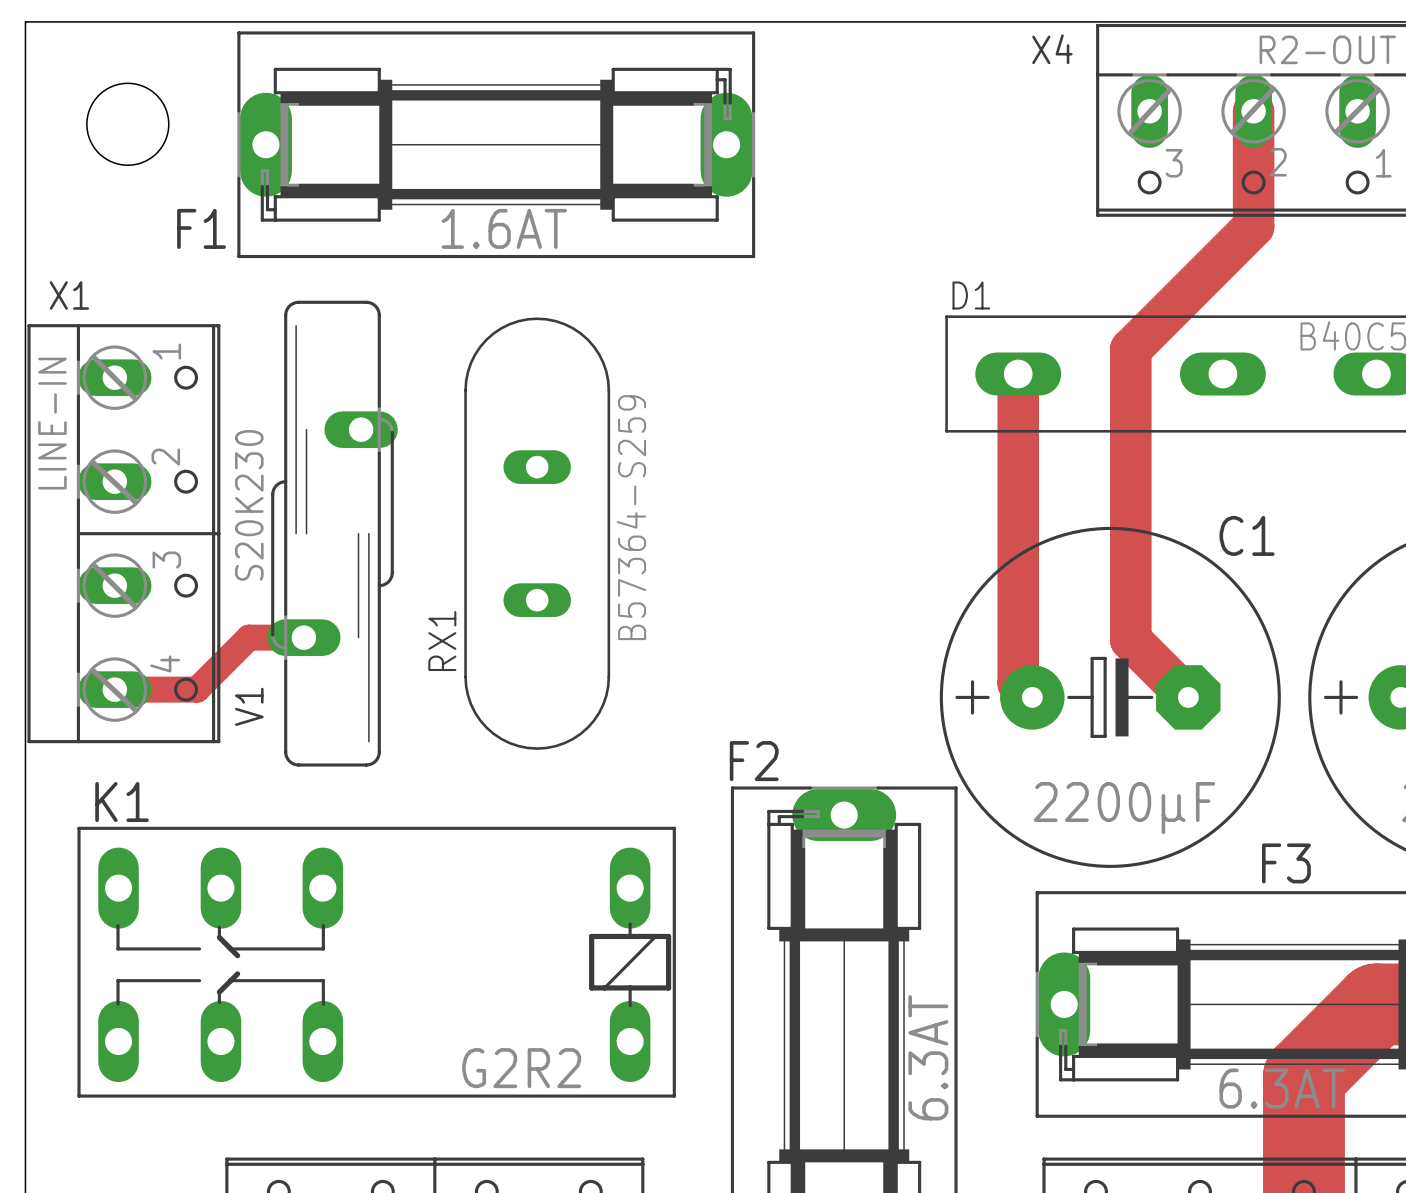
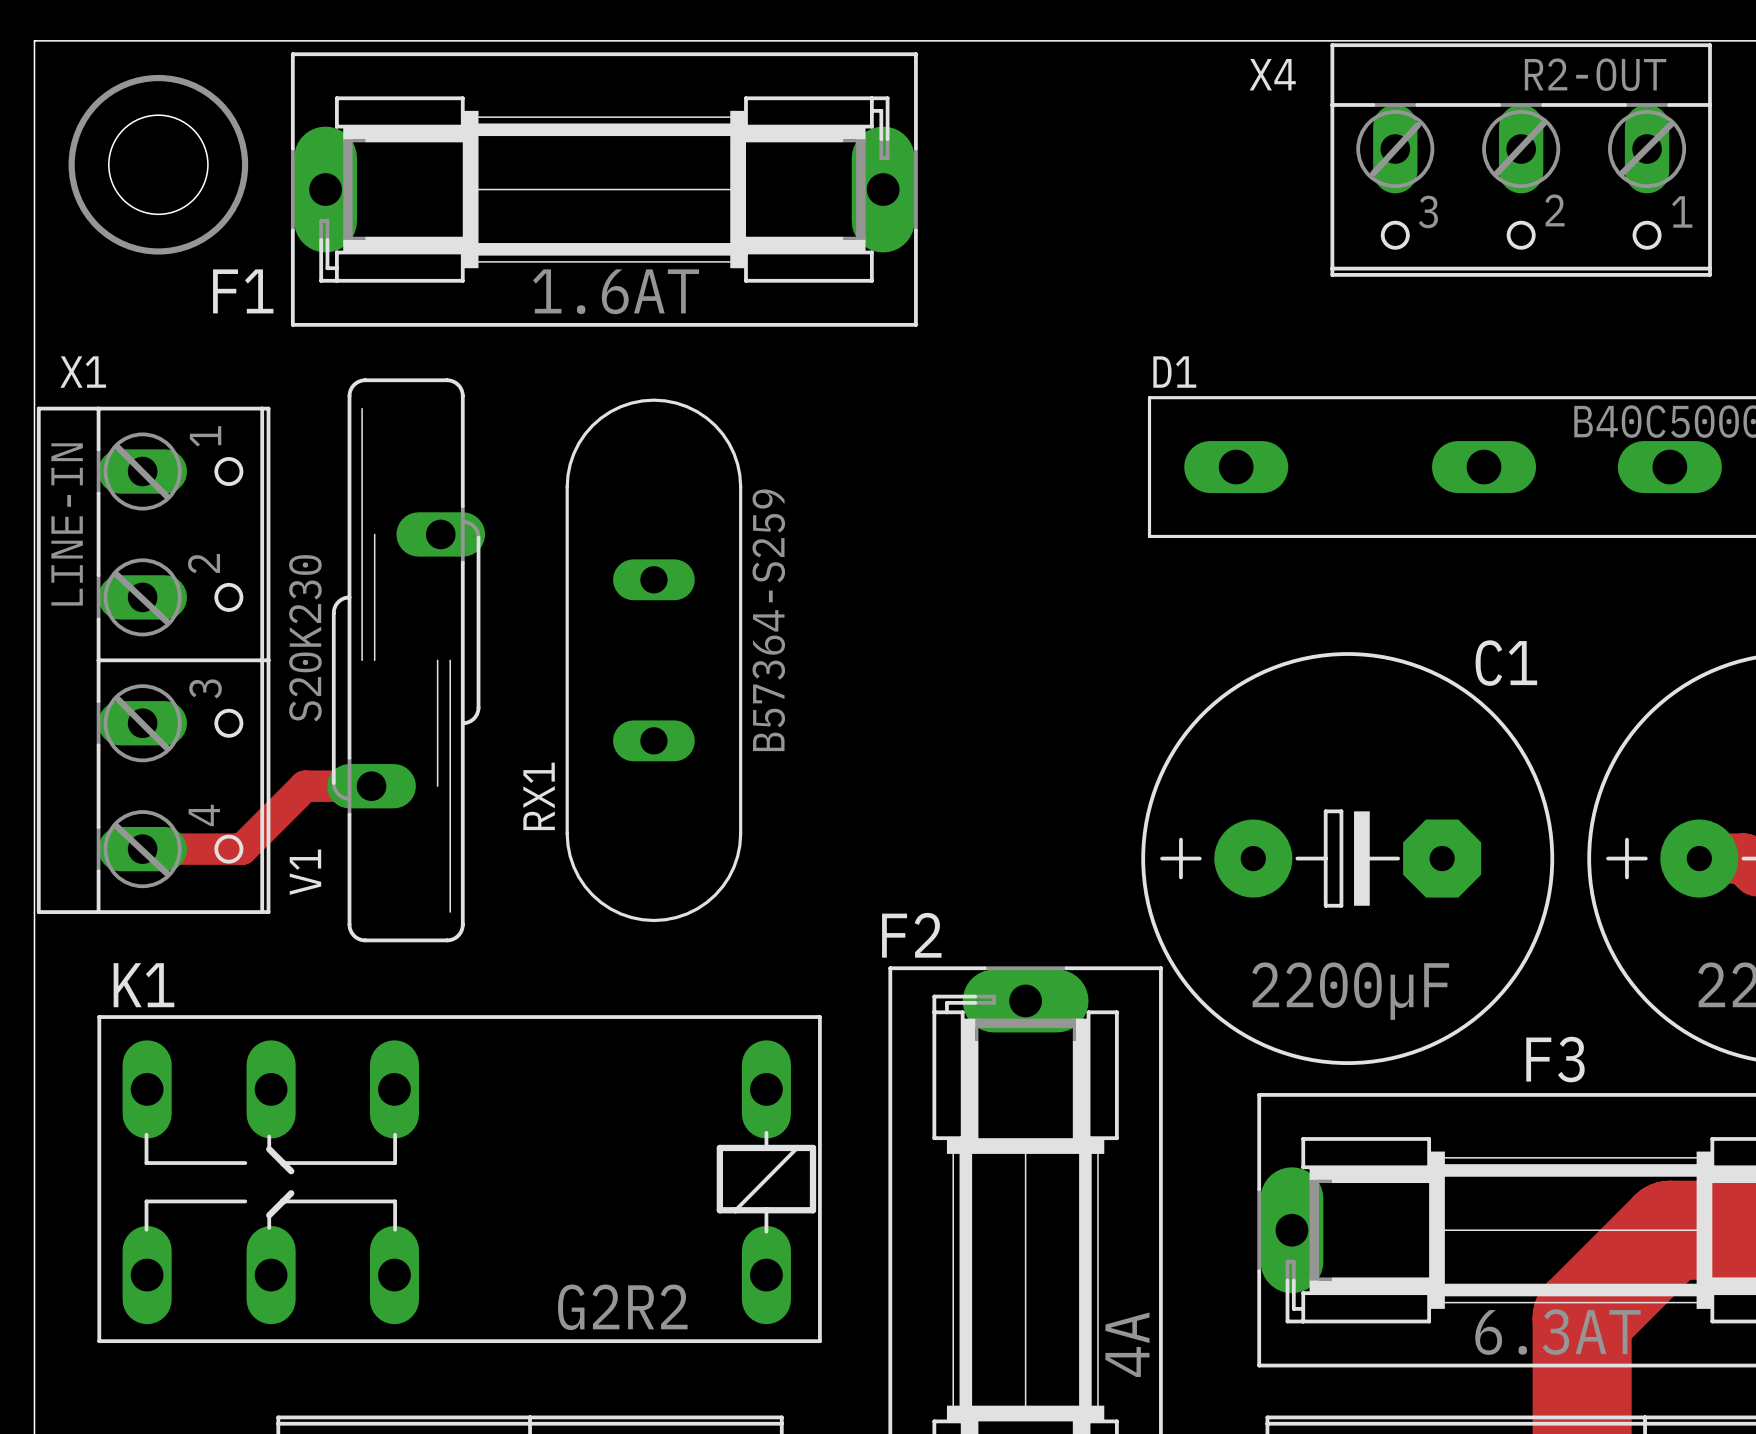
drawing: none -> [68, 74, 249, 255]
track: (1253, 111) (1253, 226) (1130, 349) (1130, 639) (1188, 697) -> none
track: (1018, 373) (1018, 683) (1032, 697) -> none
F2 value: 6.3AT (928, 1057) -> 4A (1127, 1344)

